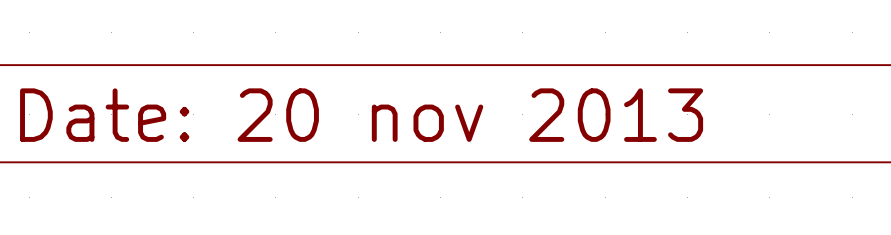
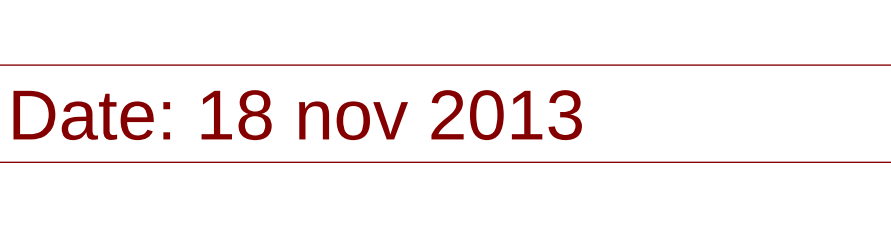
title block: Date: 20 nov 2013 (361, 115) -> Date: 18 nov 2013 (297, 115)

